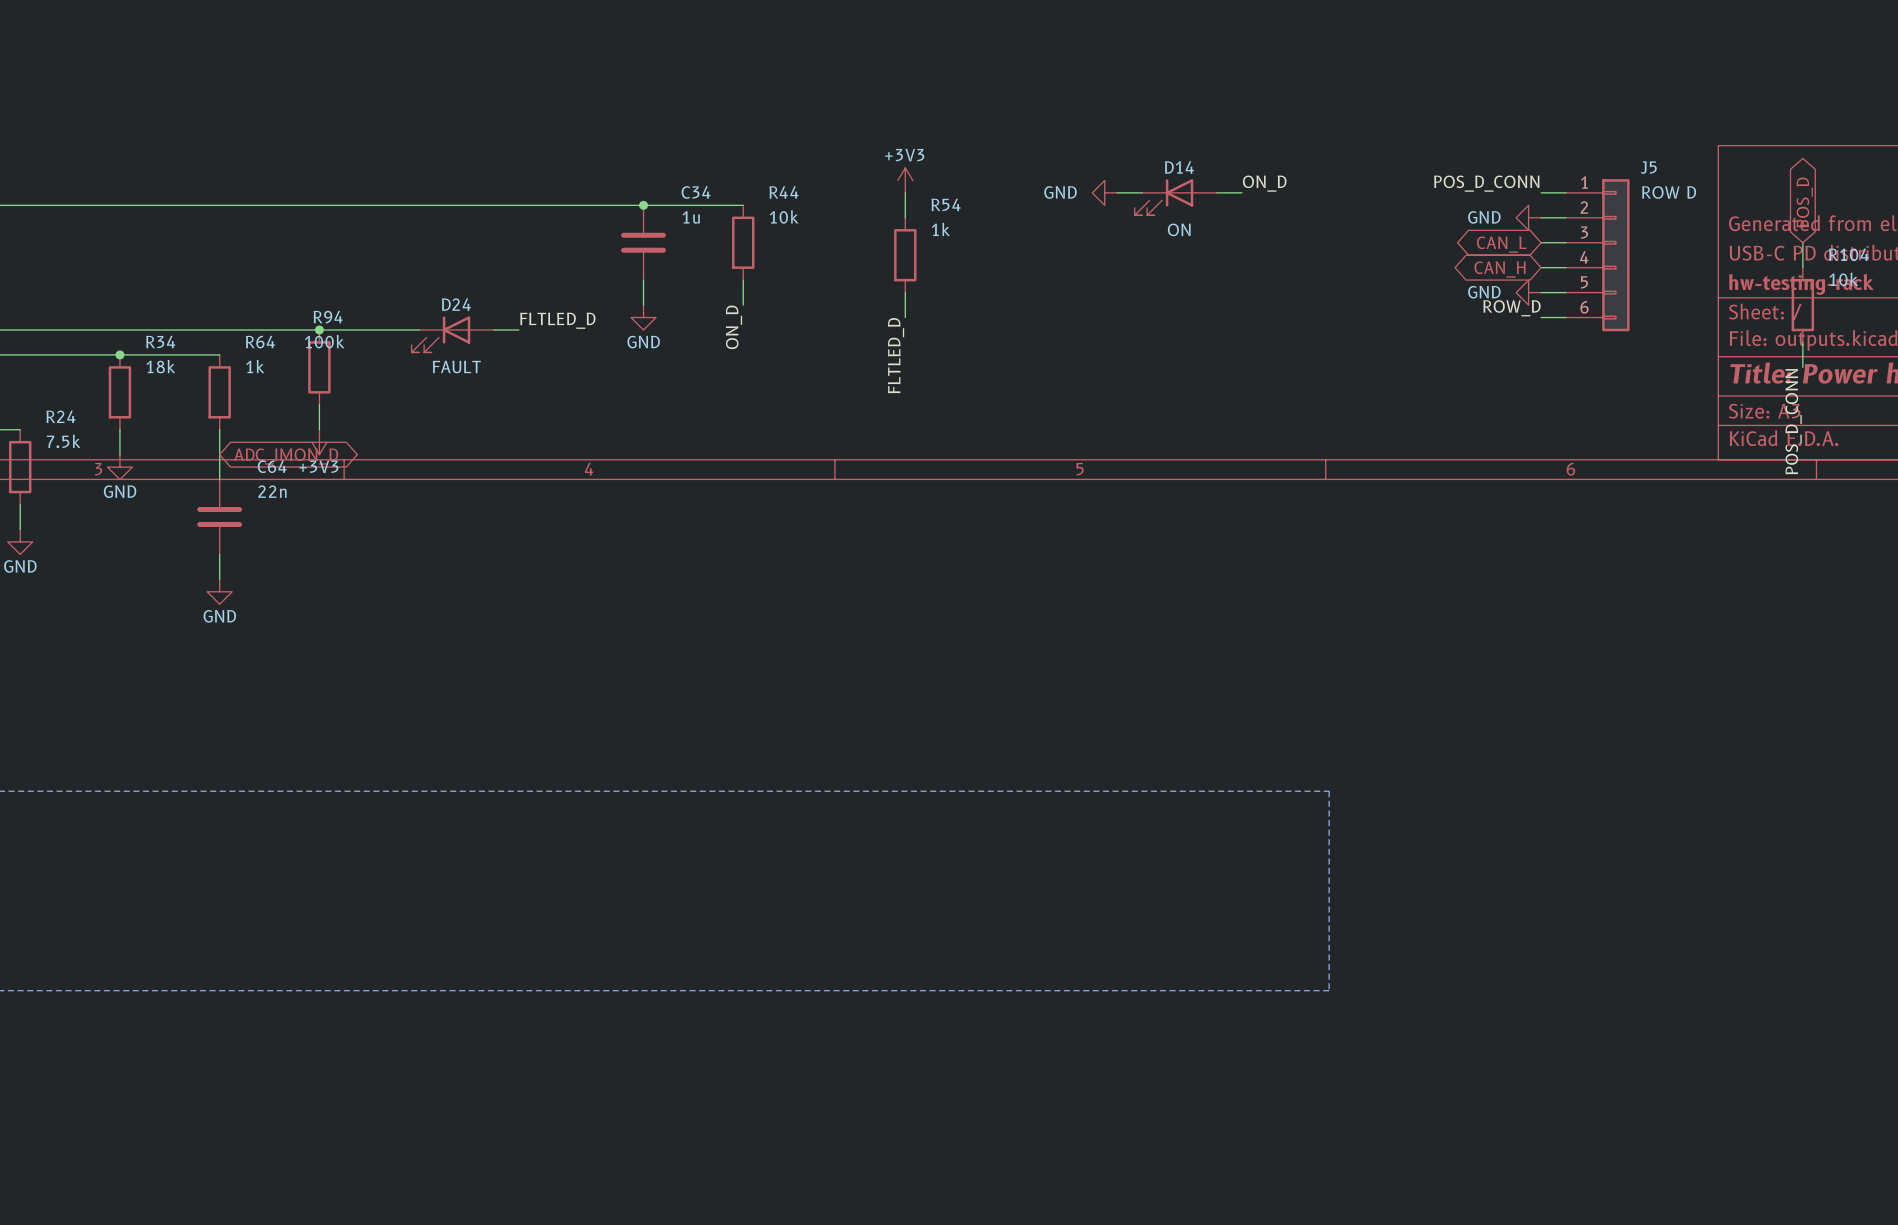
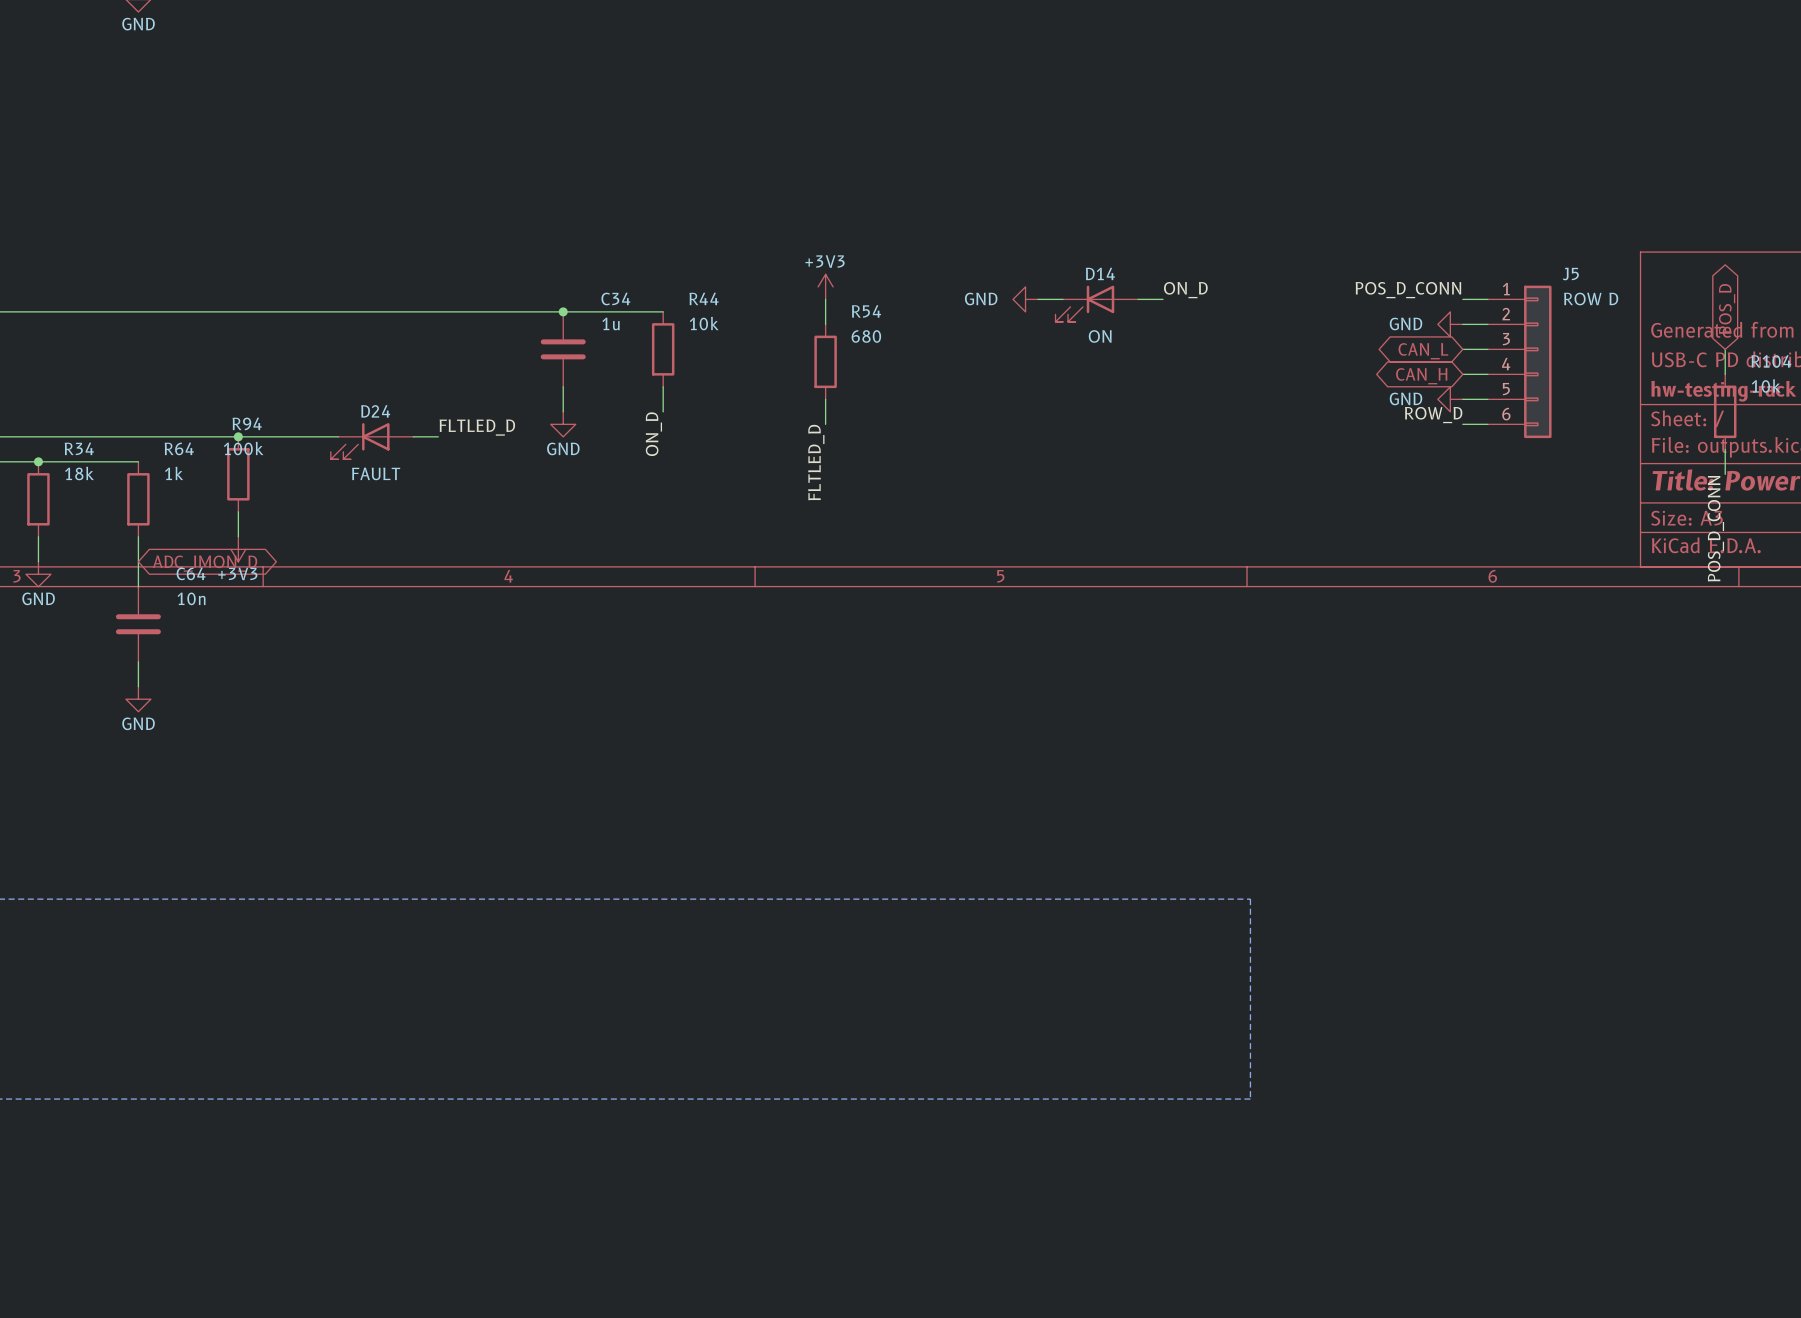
R54 value: 1k (940, 229) -> 680 (866, 336)
C64 value: 22n (272, 491) -> 10n (191, 598)

